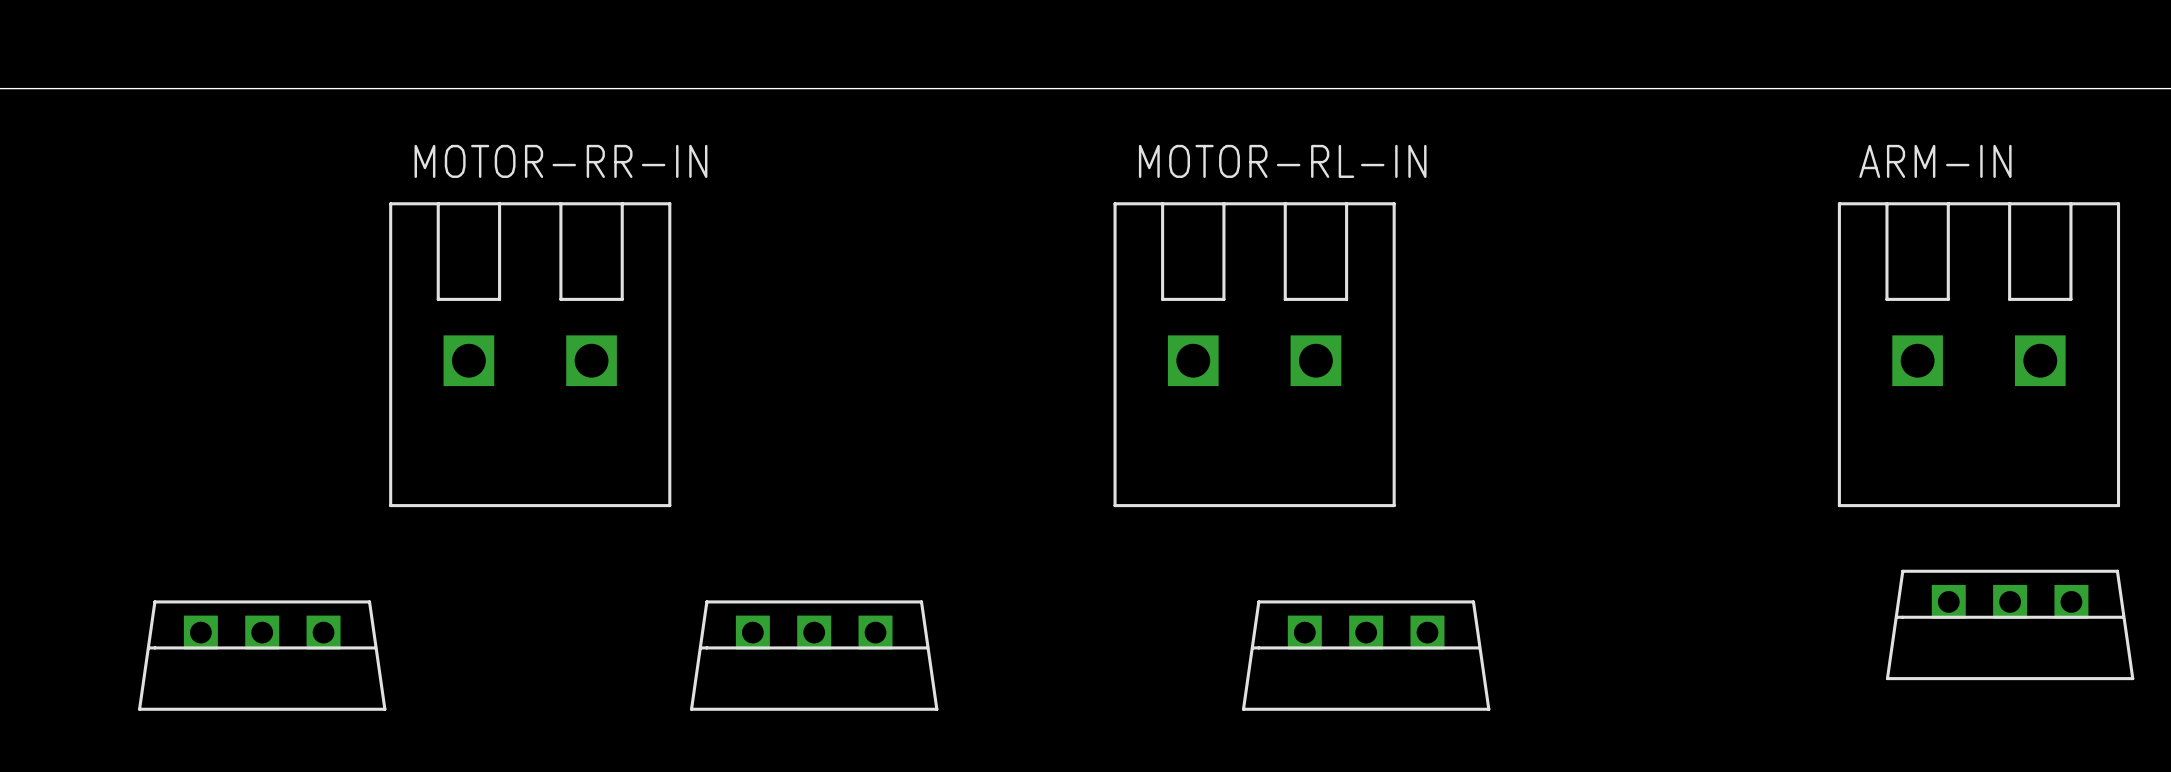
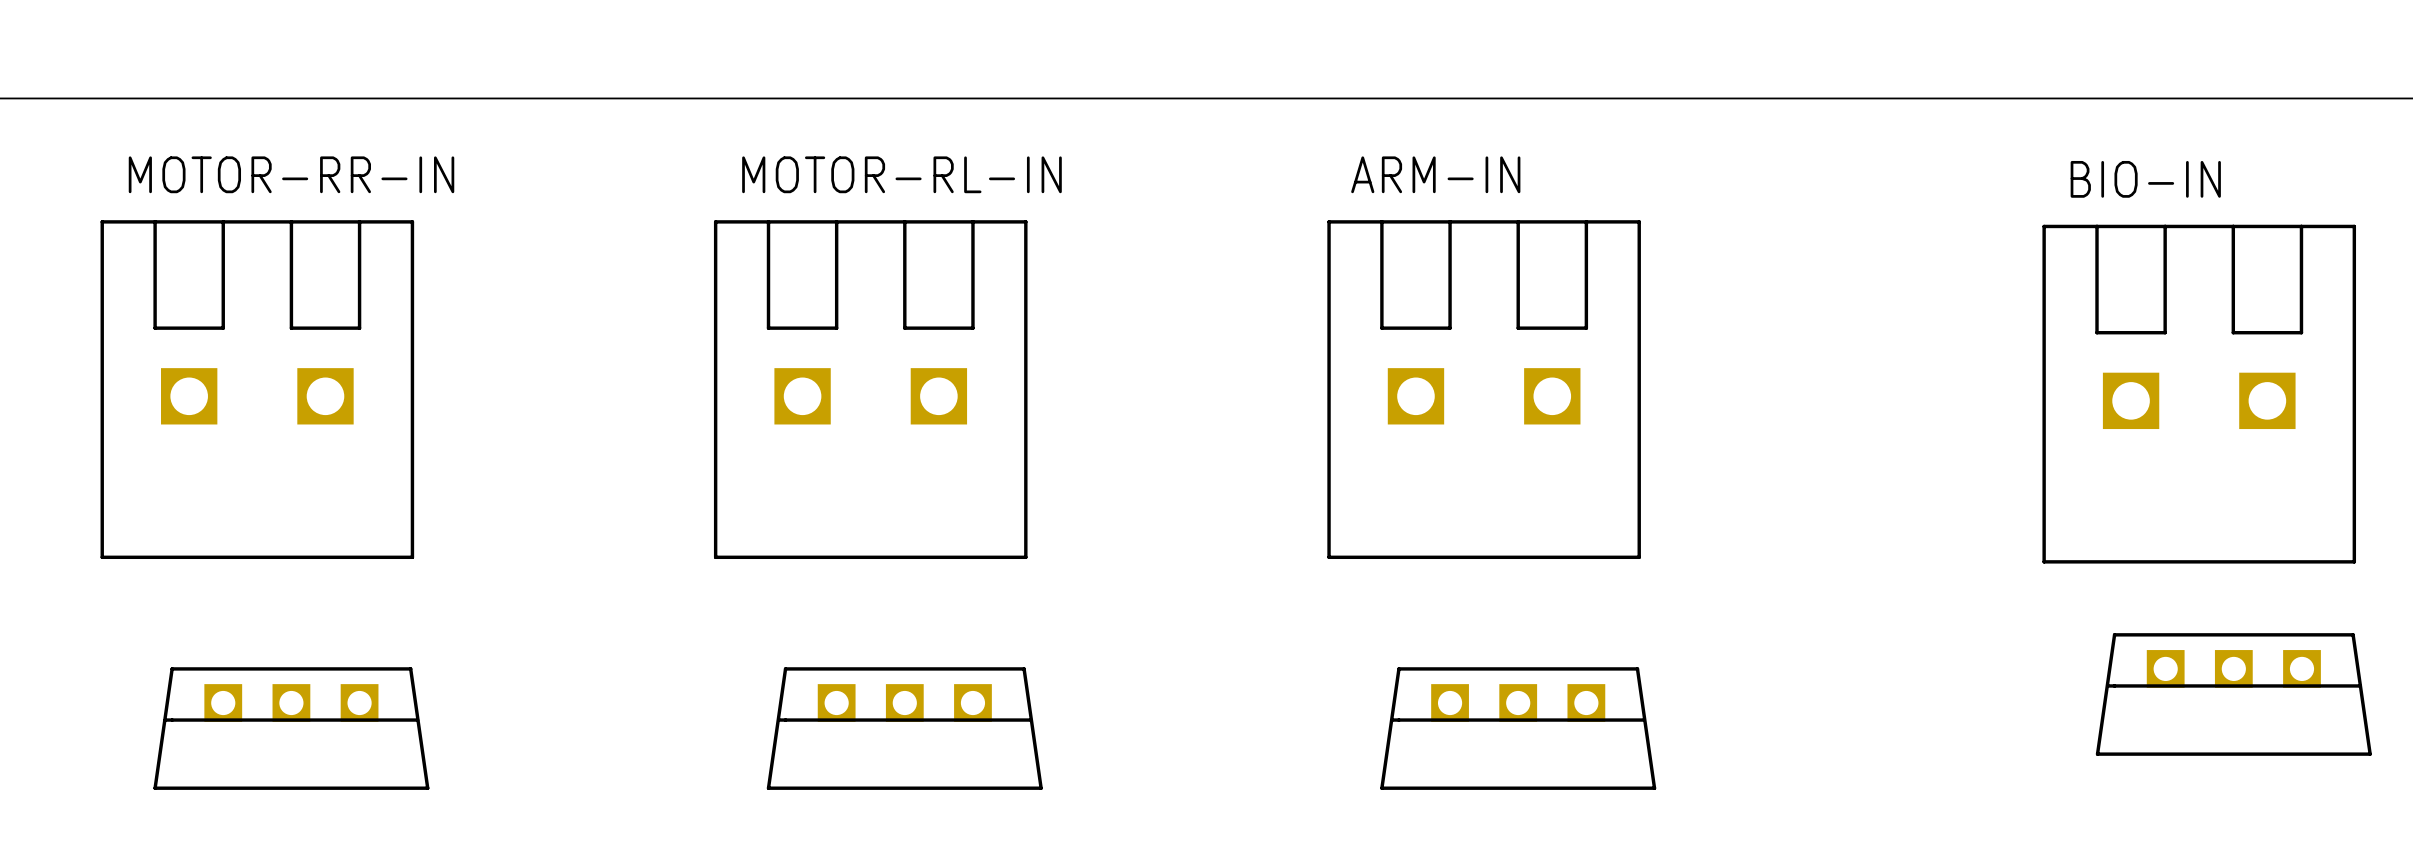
ARM-IN name: ARM-IN (1935, 161) -> BIO-IN (2145, 179)
ARM-IN: none -> (1484, 389)
MOTOR-RR-IN position: (530, 354) -> (257, 389)
MOTOR-RL-IN position: (1254, 354) -> (870, 389)

